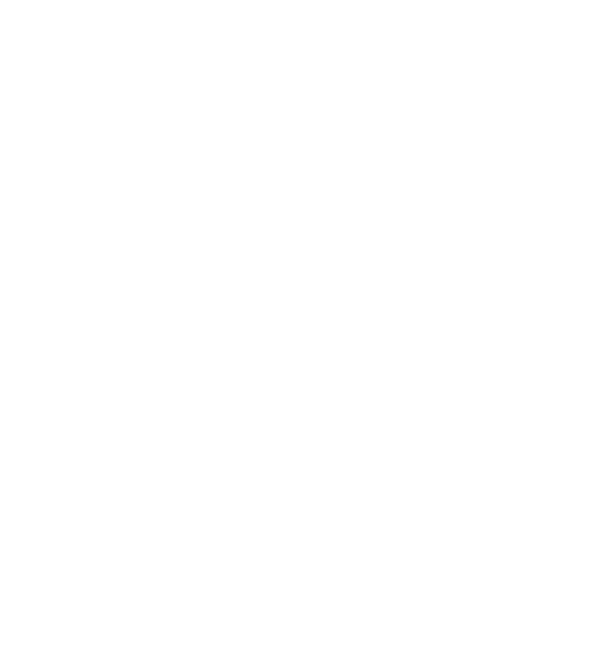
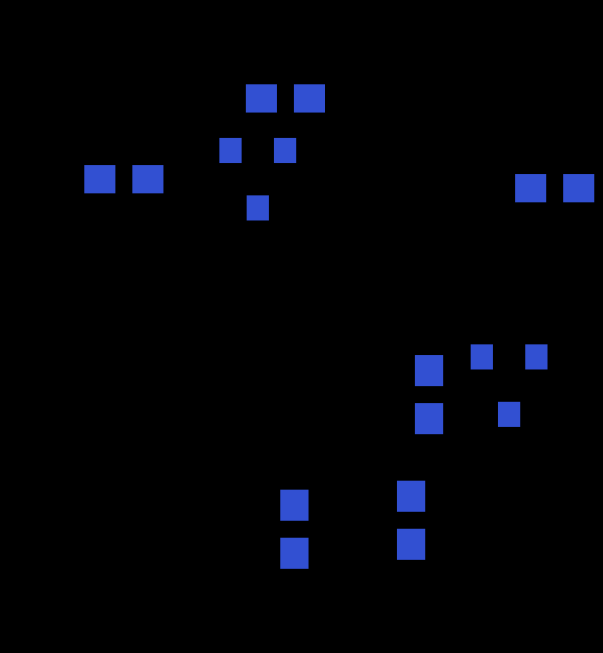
part: none -> (285, 98)
part: none -> (123, 179)
part: none -> (257, 179)
part: none -> (554, 188)
part: none -> (509, 385)
part: none -> (429, 394)
part: none -> (411, 520)
part: none -> (294, 529)

